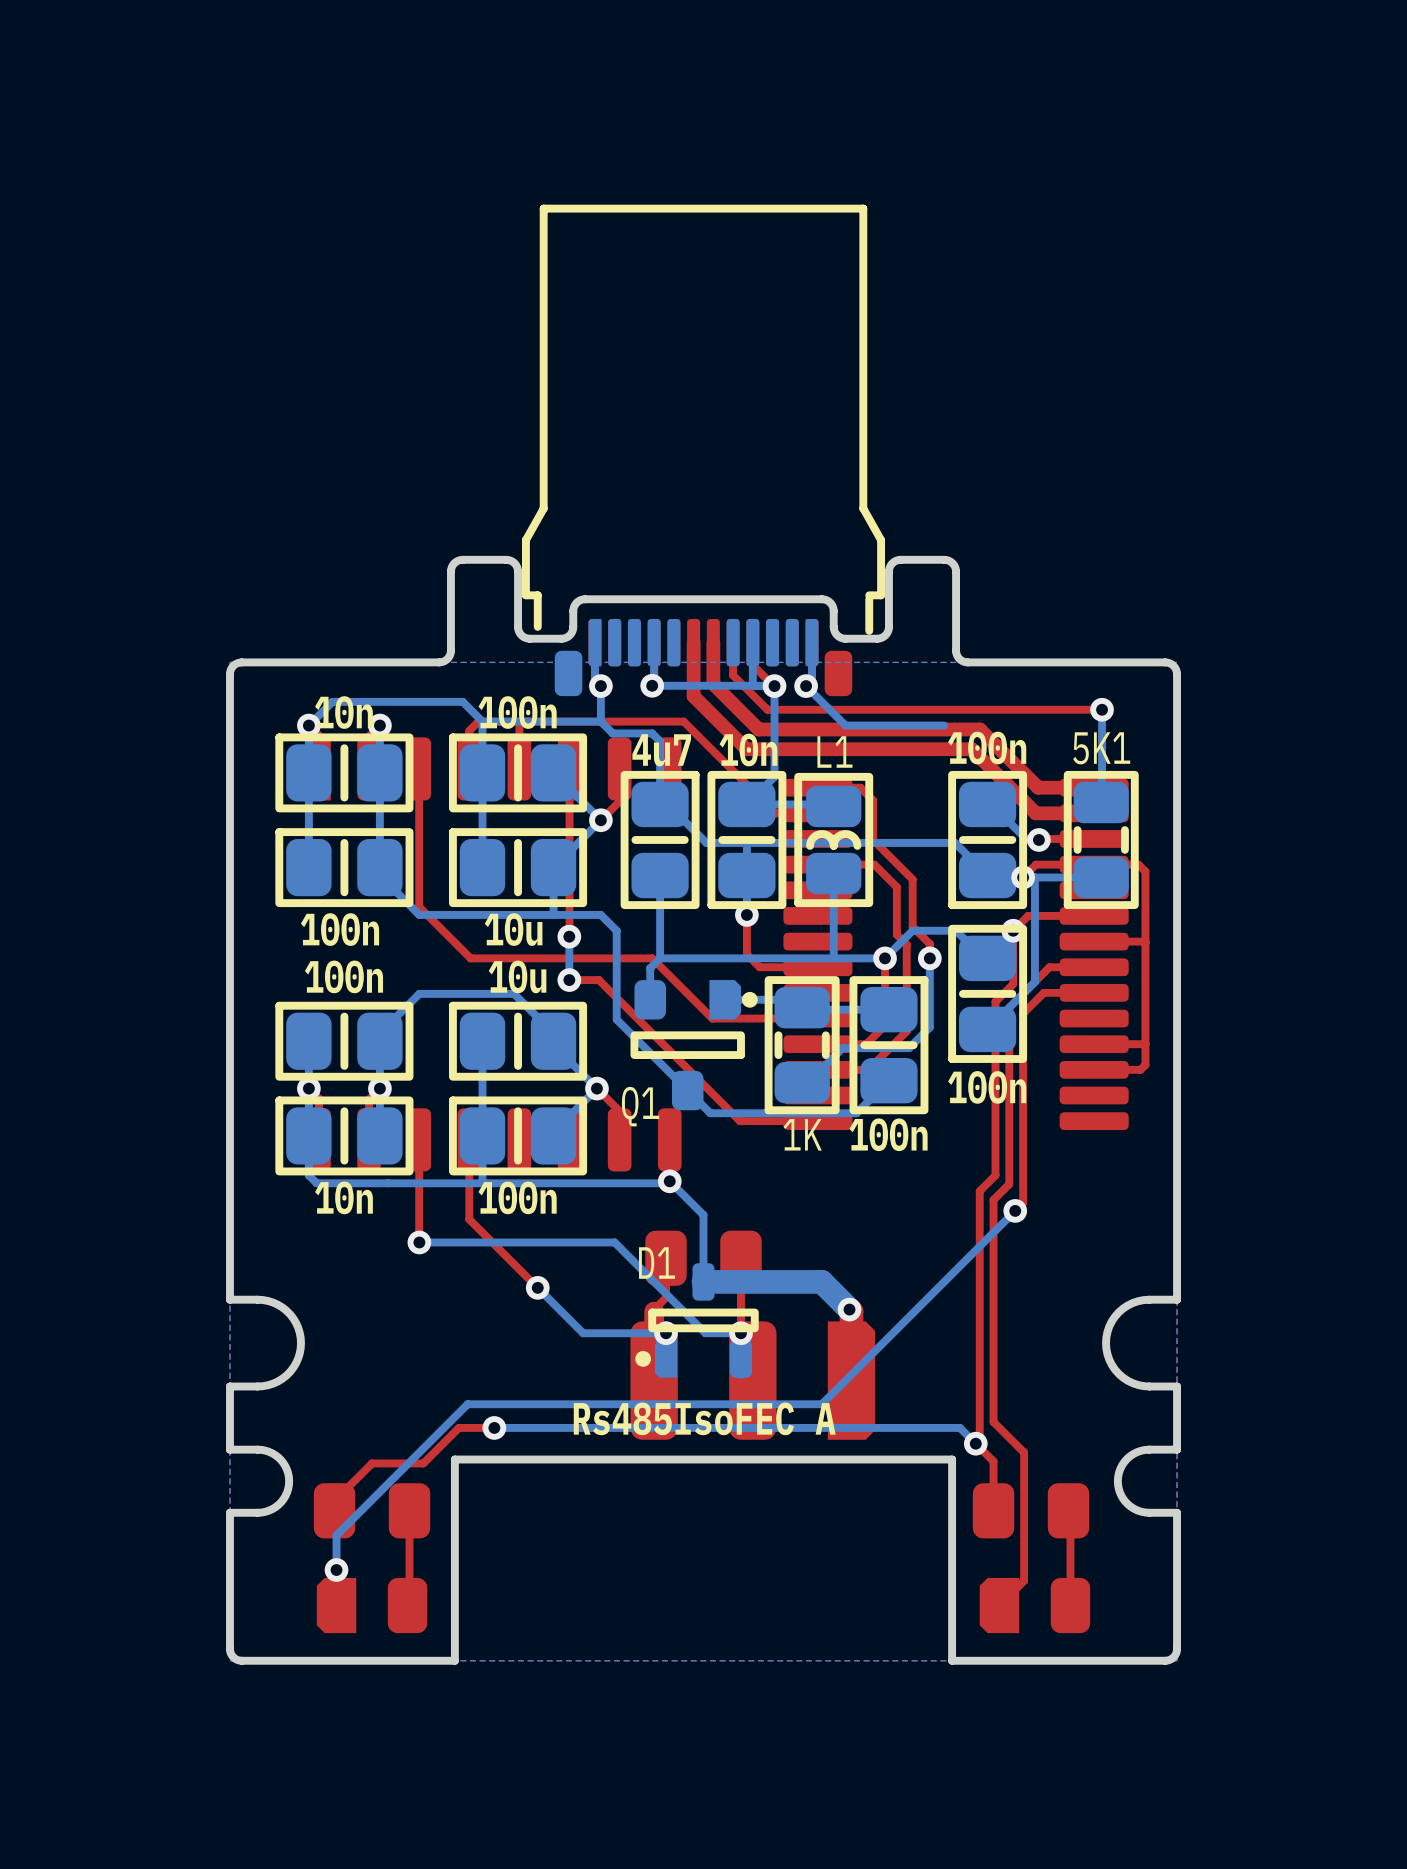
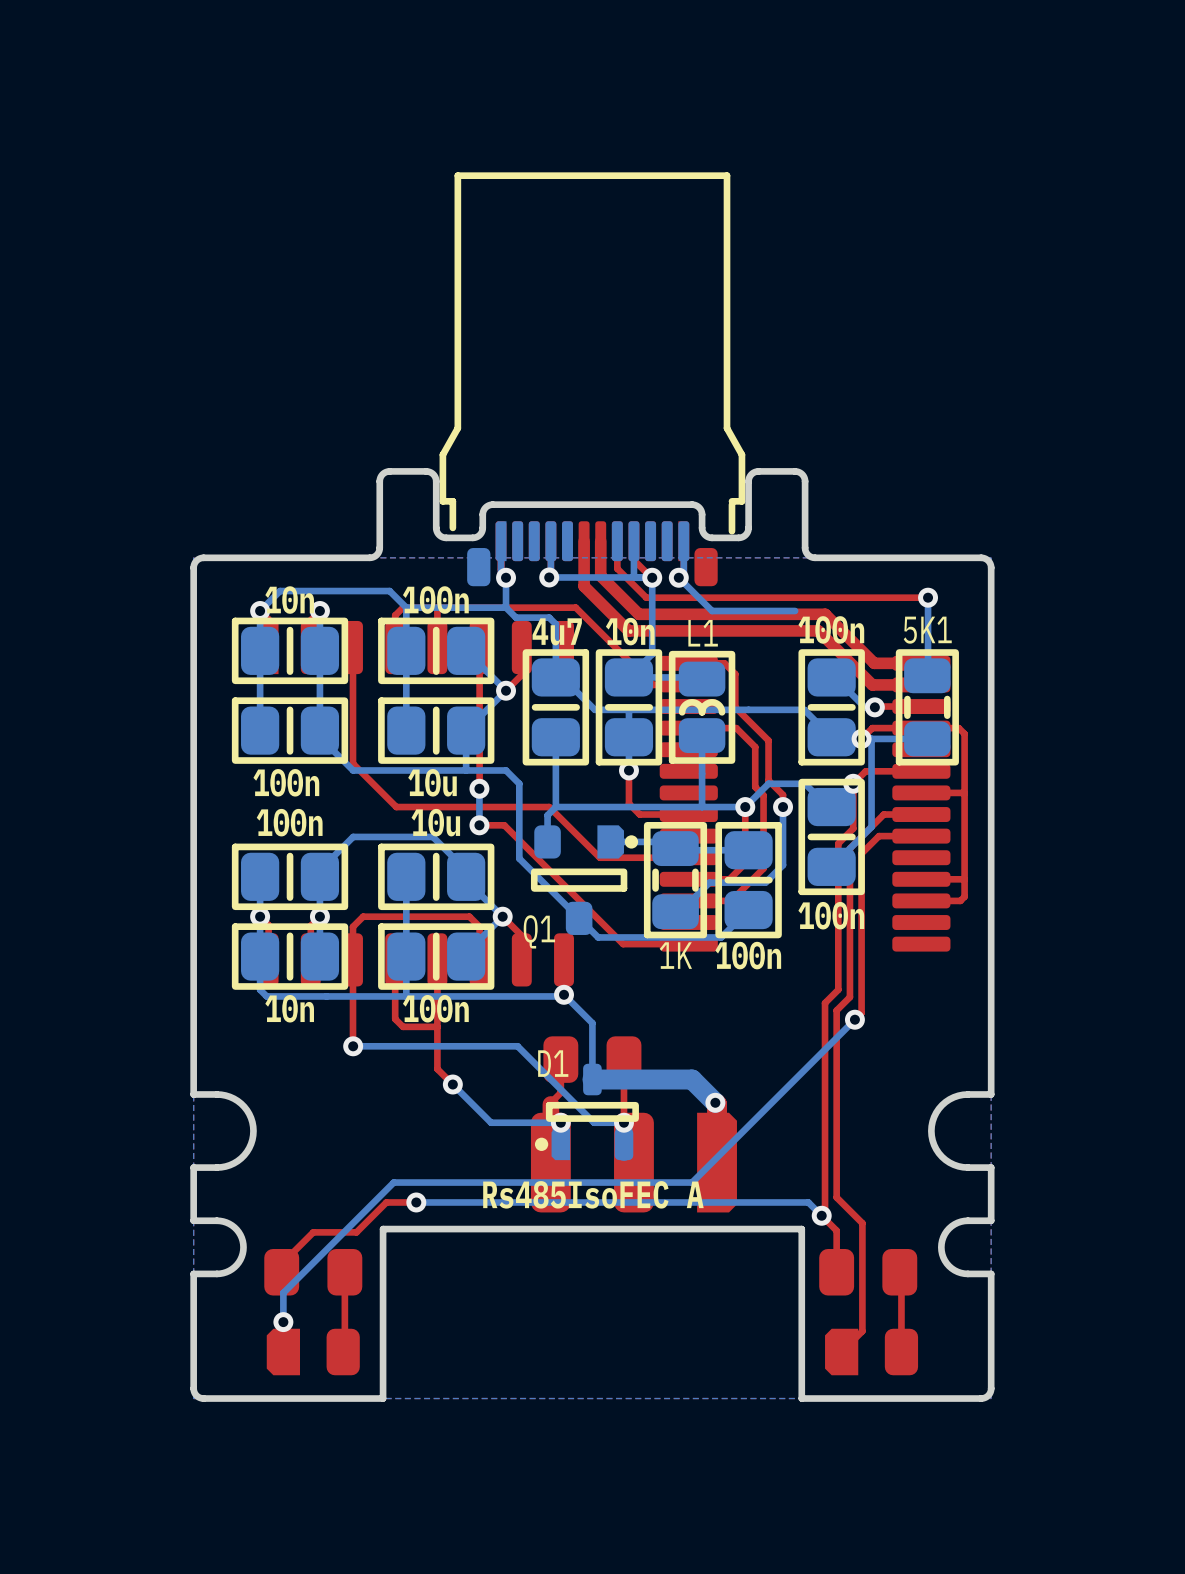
top track: none -> (437, 959) (437, 1069)
top track: none -> (479, 959) (479, 926) (469, 916) (363, 916) (353, 926) (353, 959)
top track: (469, 1210) (469, 1219) (519, 1269) -> (395, 1019) (403, 1026) (437, 1026)

